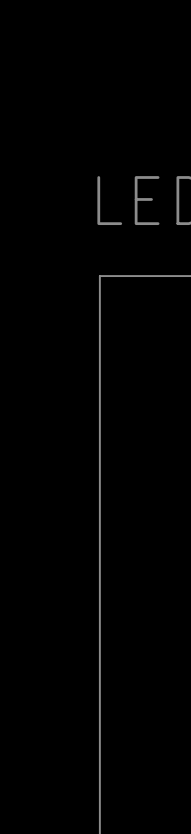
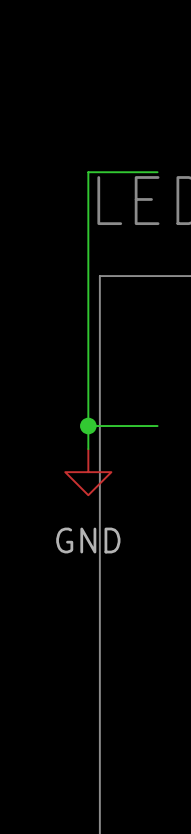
wire: none -> (157, 172) (88, 172) (88, 449)
wire: none -> (88, 426) (157, 426)
junction: none -> (88, 426)
power symbol: none -> GND (88, 472)

